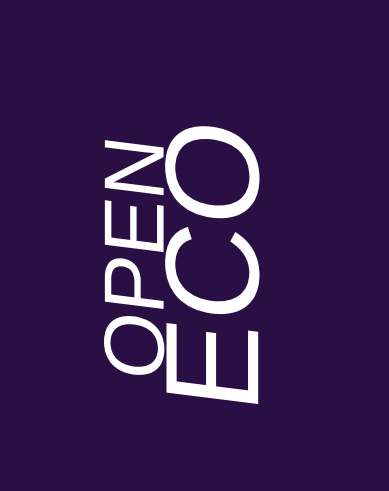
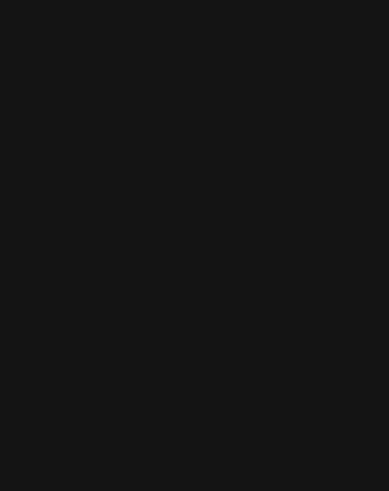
text: OPEN (134, 257) -> none
text: ECO (212, 264) -> none

